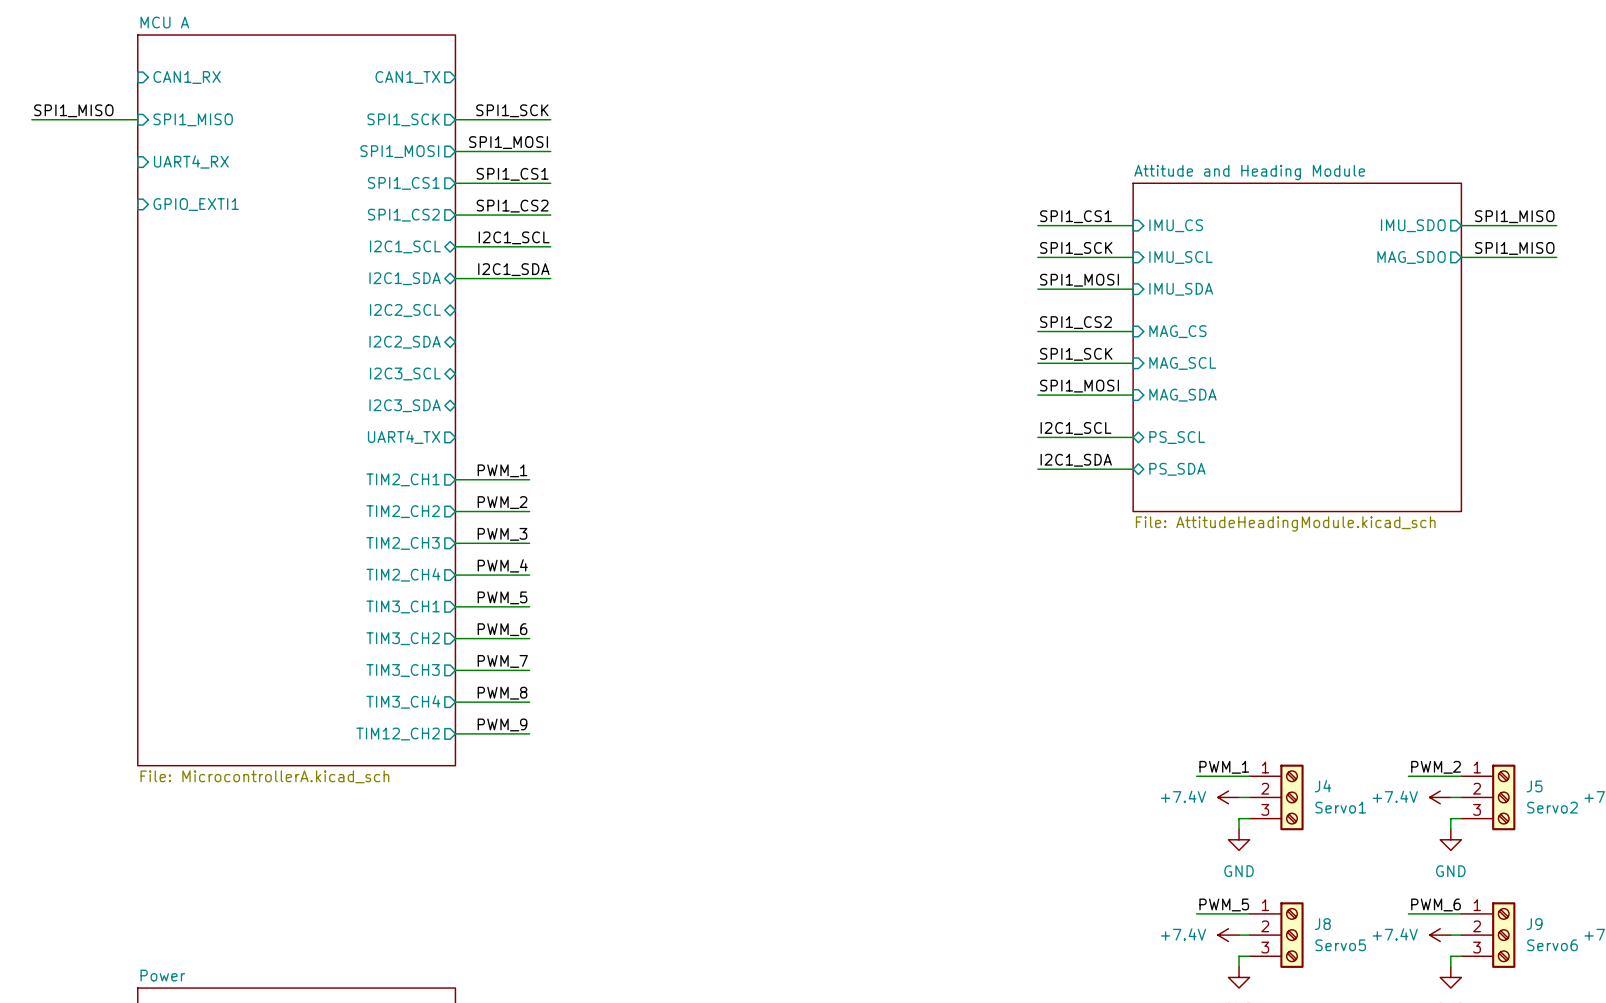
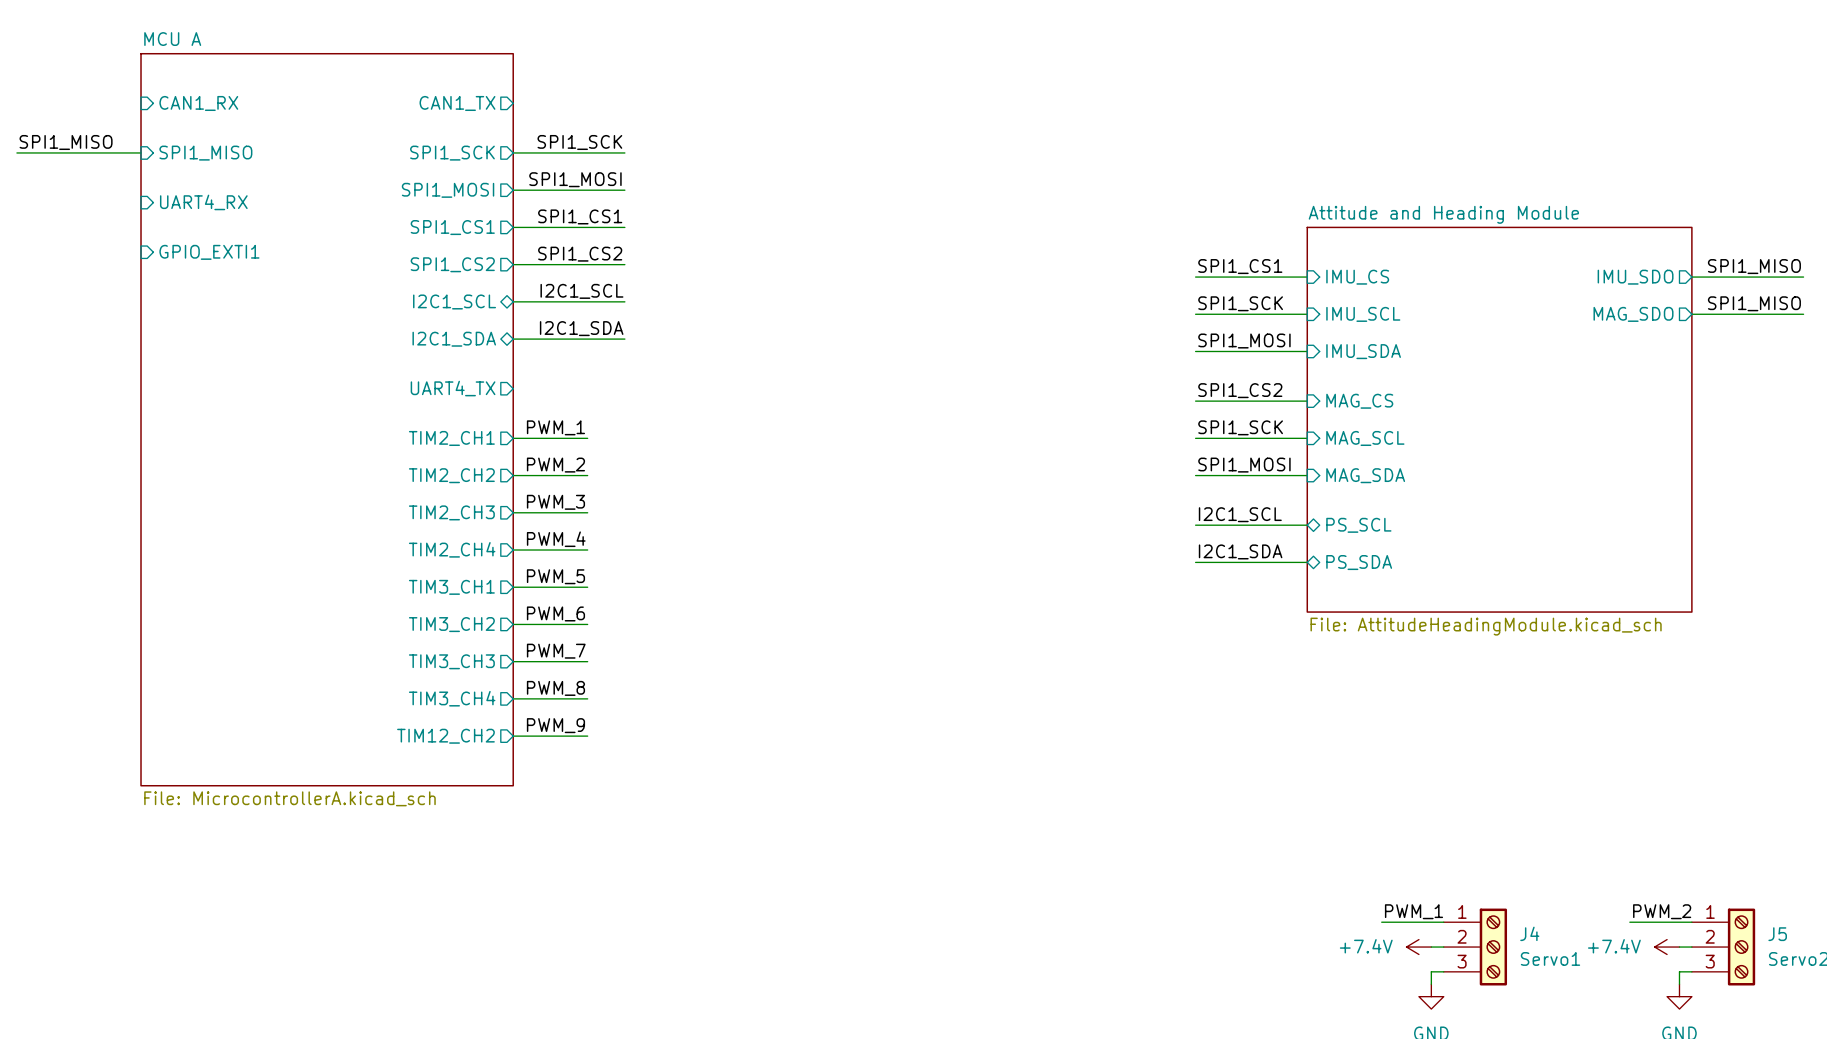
sheet pin: I2C2_SCL (405, 310) -> none
sheet pin: I2C2_SDA (405, 342) -> none
sheet MCU A: none -> File: MicrocontrollerA.kicad_sch (327, 419)
wire: none -> (513, 438) (587, 438)
sheet pin: I2C3_SCL (405, 373) -> none
wire: none -> (513, 475) (587, 475)
sheet MCU A: File: MicrocontrollerA.kicad_sch (296, 400) -> none
sheet pin: I2C3_SDA (405, 405) -> none
wire: none -> (513, 512) (587, 512)
sheet pin position: UART4_TX (404, 437) -> UART4_TX (453, 388)
wire: none -> (513, 550) (587, 550)
label position: PWM_1 (502, 470) -> PWM_1 (555, 427)
sheet pin position: TIM2_CH1 (403, 479) -> TIM2_CH1 (451, 438)
wire: (455, 479) (529, 479) -> none
wire: none -> (513, 587) (587, 587)
label position: PWM_2 (502, 502) -> PWM_2 (555, 465)
sheet pin position: TIM2_CH2 (403, 511) -> TIM2_CH2 (451, 475)
wire: (455, 511) (529, 511) -> none
wire: none -> (513, 624) (587, 624)
label position: PWM_3 (502, 534) -> PWM_3 (555, 502)
sheet pin position: TIM2_CH3 (403, 543) -> TIM2_CH3 (451, 512)
wire: (455, 543) (529, 543) -> none
wire: none -> (513, 661) (587, 661)
label position: PWM_4 (502, 565) -> PWM_4 (556, 539)
sheet pin position: TIM2_CH4 (403, 574) -> TIM2_CH4 (452, 549)
wire: (455, 575) (529, 575) -> none
wire: none -> (513, 698) (587, 698)
label position: PWM_5 (502, 597) -> PWM_5 (555, 576)
sheet pin position: TIM3_CH1 (403, 606) -> TIM3_CH1 (451, 587)
wire: (455, 606) (529, 606) -> none
wire: none -> (513, 736) (587, 736)
label position: PWM_6 (502, 629) -> PWM_6 (555, 613)
sheet pin position: TIM3_CH2 (403, 638) -> TIM3_CH2 (451, 624)
wire: (455, 638) (529, 638) -> none
label position: PWM_7 (502, 661) -> PWM_7 (556, 651)
sheet pin position: TIM3_CH3 (403, 670) -> TIM3_CH3 (451, 661)
wire: (455, 670) (529, 670) -> none
label position: PWM_8 (502, 693) -> PWM_8 (555, 688)
sheet pin position: TIM3_CH4 (403, 701) -> TIM3_CH4 (452, 698)
wire: (455, 702) (529, 702) -> none
label position: PWM_9 (502, 724) -> PWM_9 (555, 725)
wire: (455, 733) (529, 733) -> none
sheet pin position: TIM12_CH2 (398, 734) -> TIM12_CH2 (445, 736)

